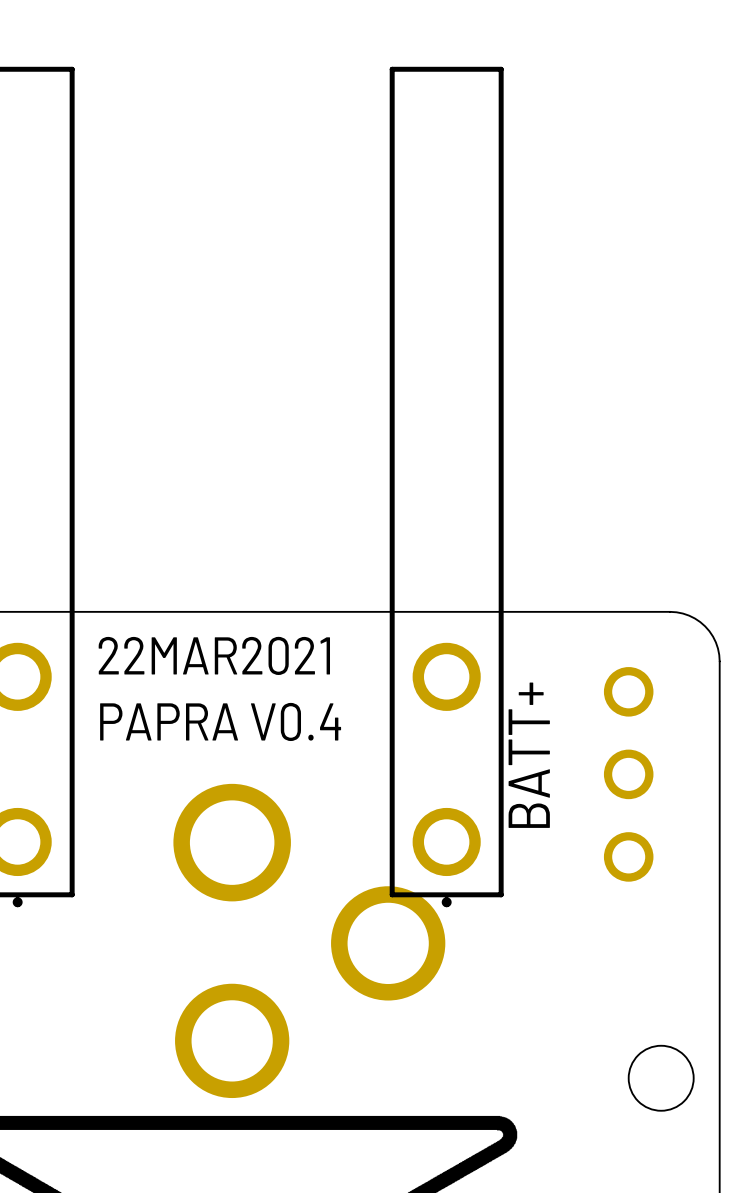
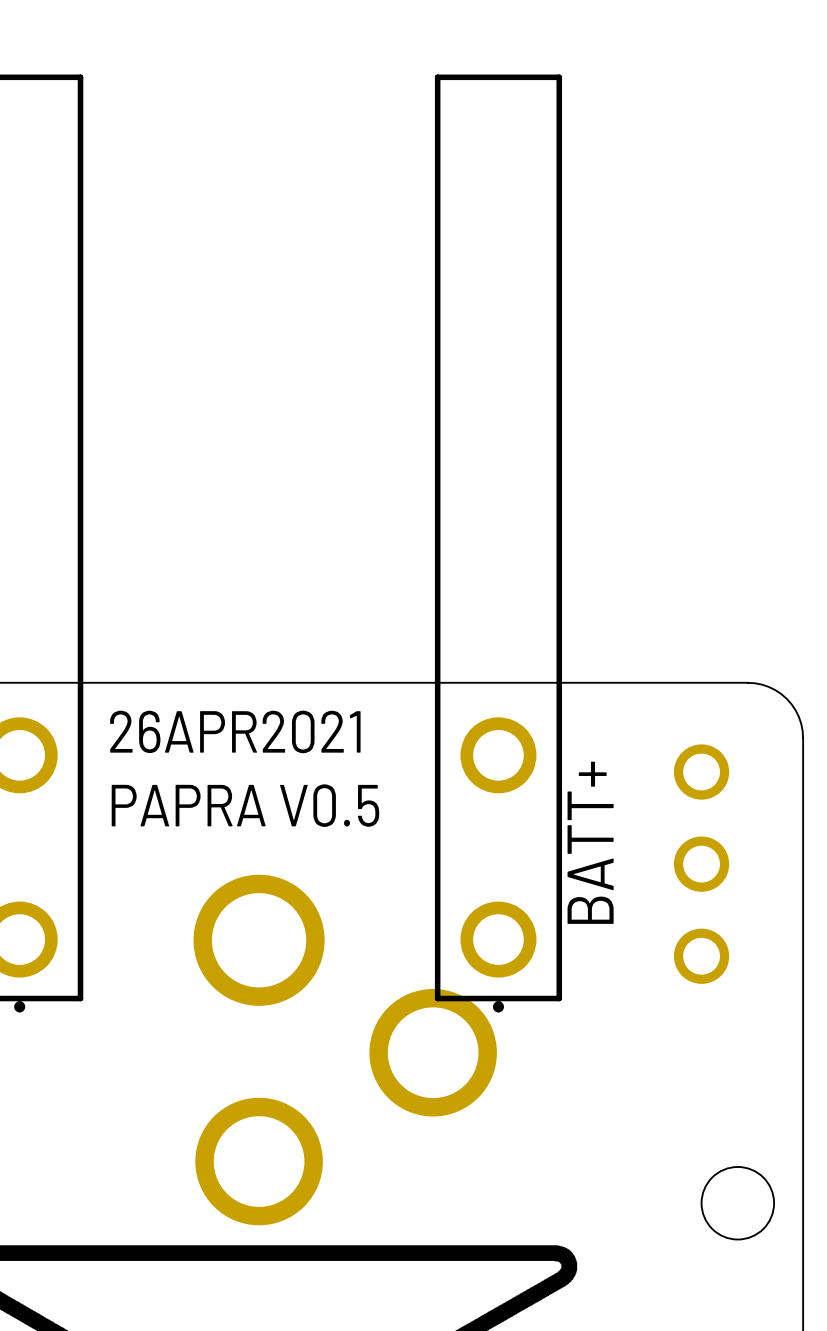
text: 22MAR2021 (214, 655) -> 26APR2021 (235, 731)
text: PAPRA V0.4 (220, 721) -> PAPRA V0.5 (245, 805)

